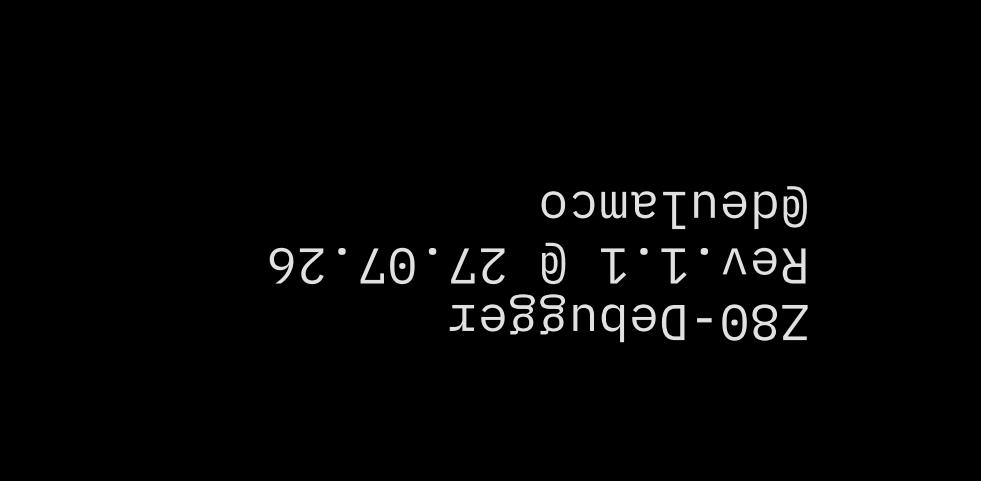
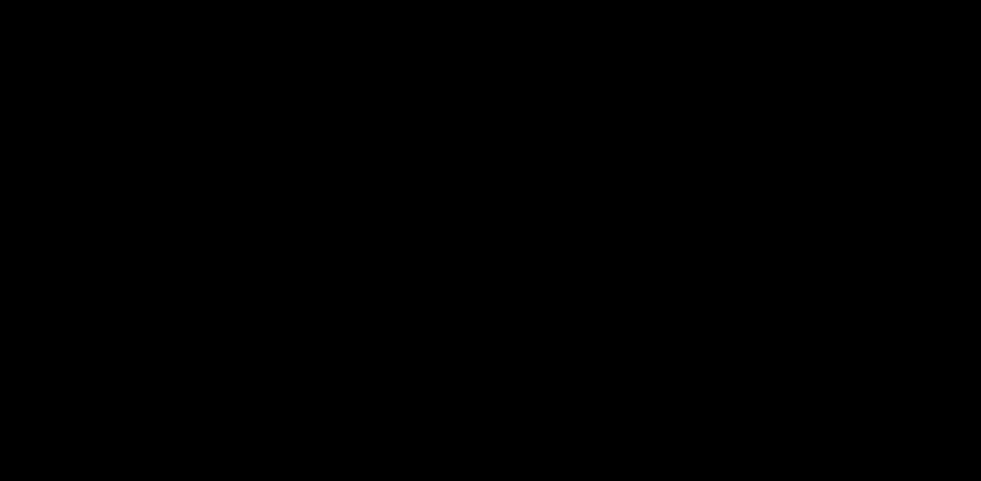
text: @deulamco (674, 207) -> none
text: Rev.1.1 @ 27.07.26 (537, 263) -> none
text: Z80-Debugger (628, 318) -> none

